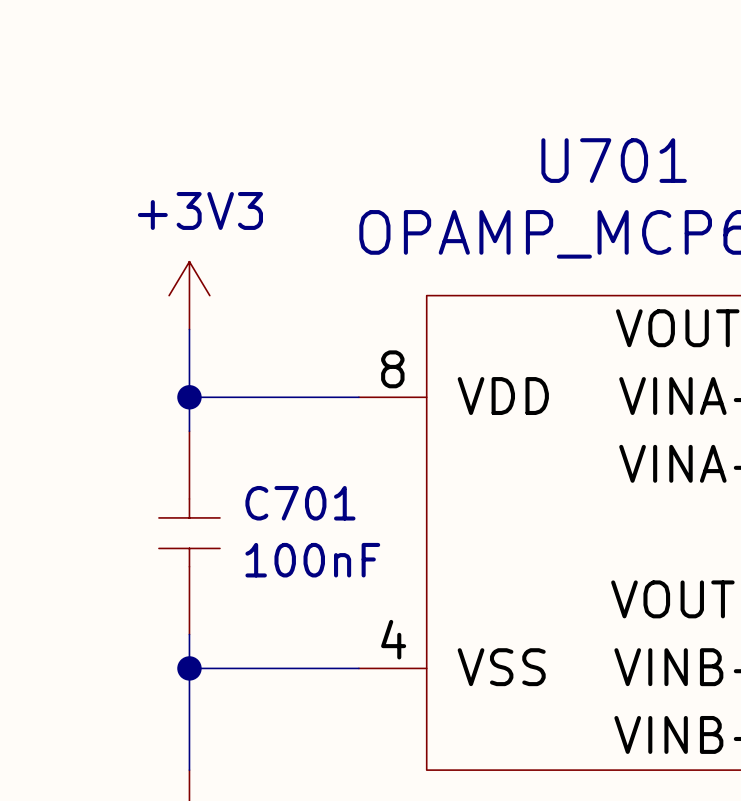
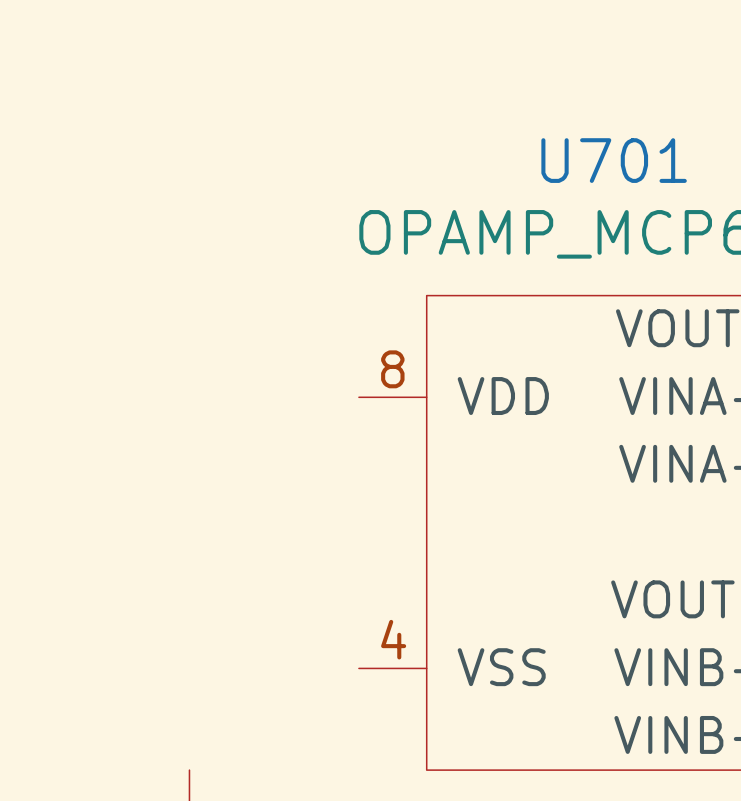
power symbol: +3V3 (189, 295) -> none
wire: (189, 329) (189, 431) -> none
wire: (189, 397) (358, 397) -> none
junction: (189, 397) -> none
C701: 100nF (189, 532) -> none
wire: (189, 634) (189, 770) -> none
wire: (189, 668) (358, 668) -> none
junction: (189, 668) -> none

